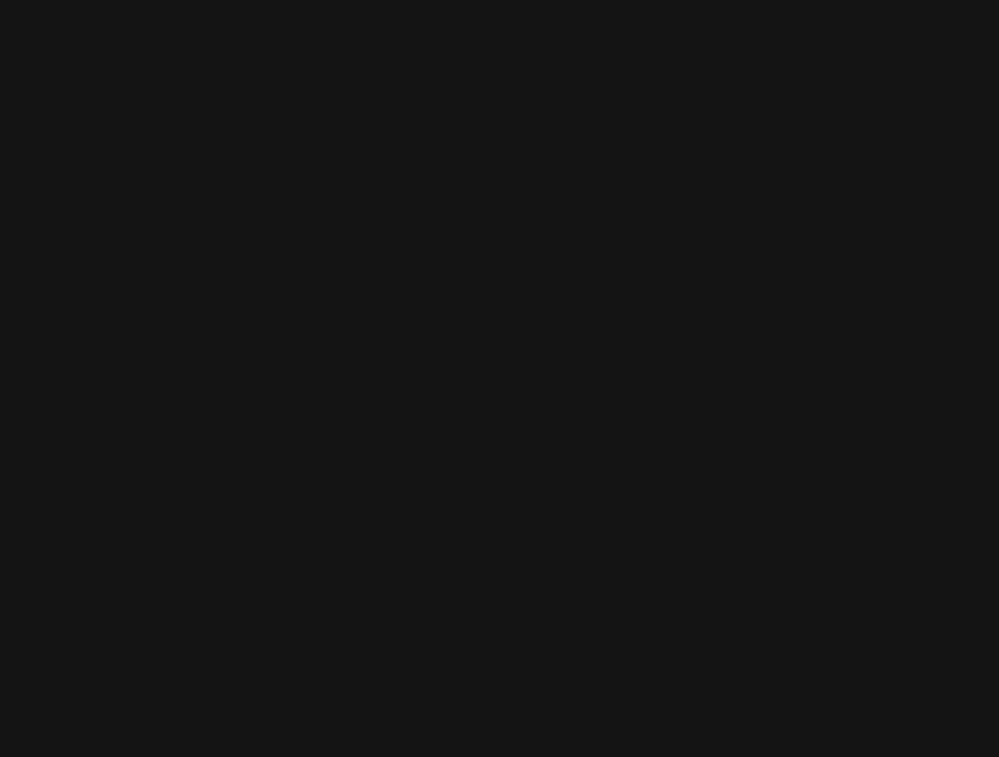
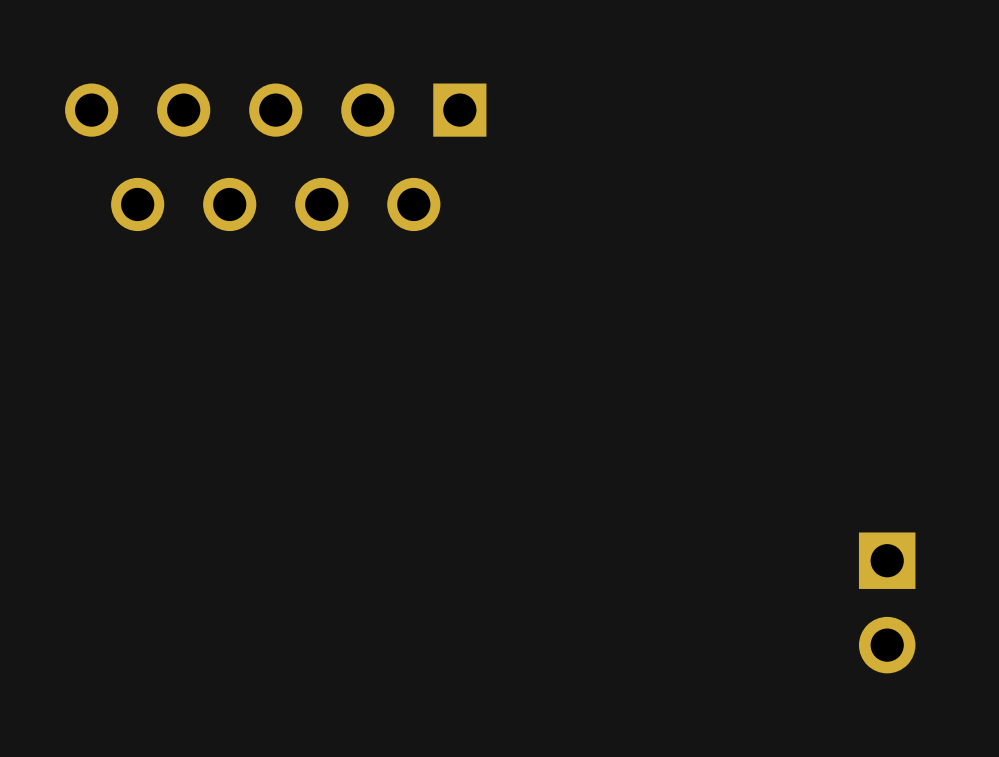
part: none -> (275, 157)
part: none -> (887, 602)

